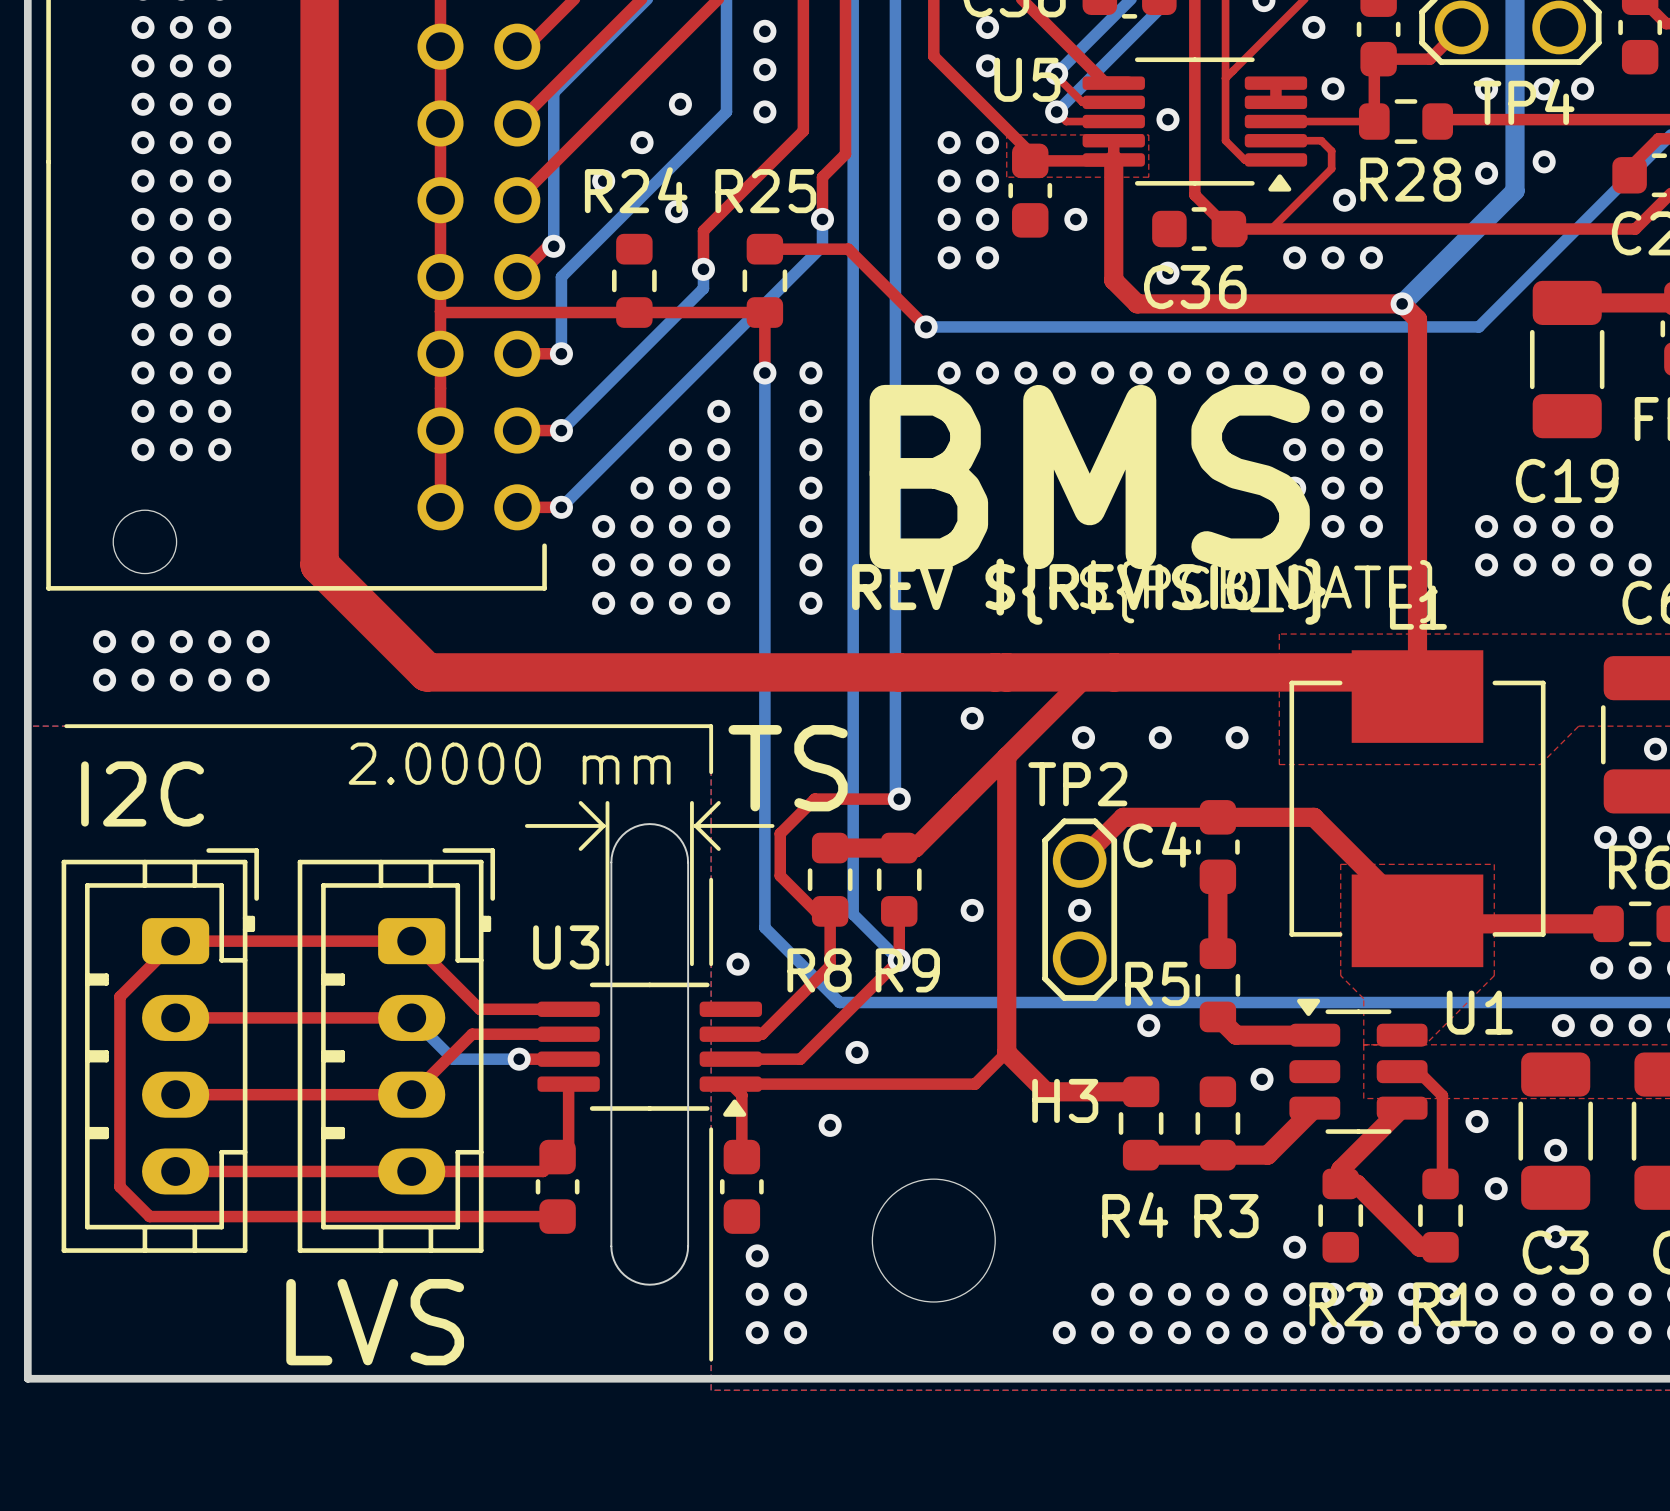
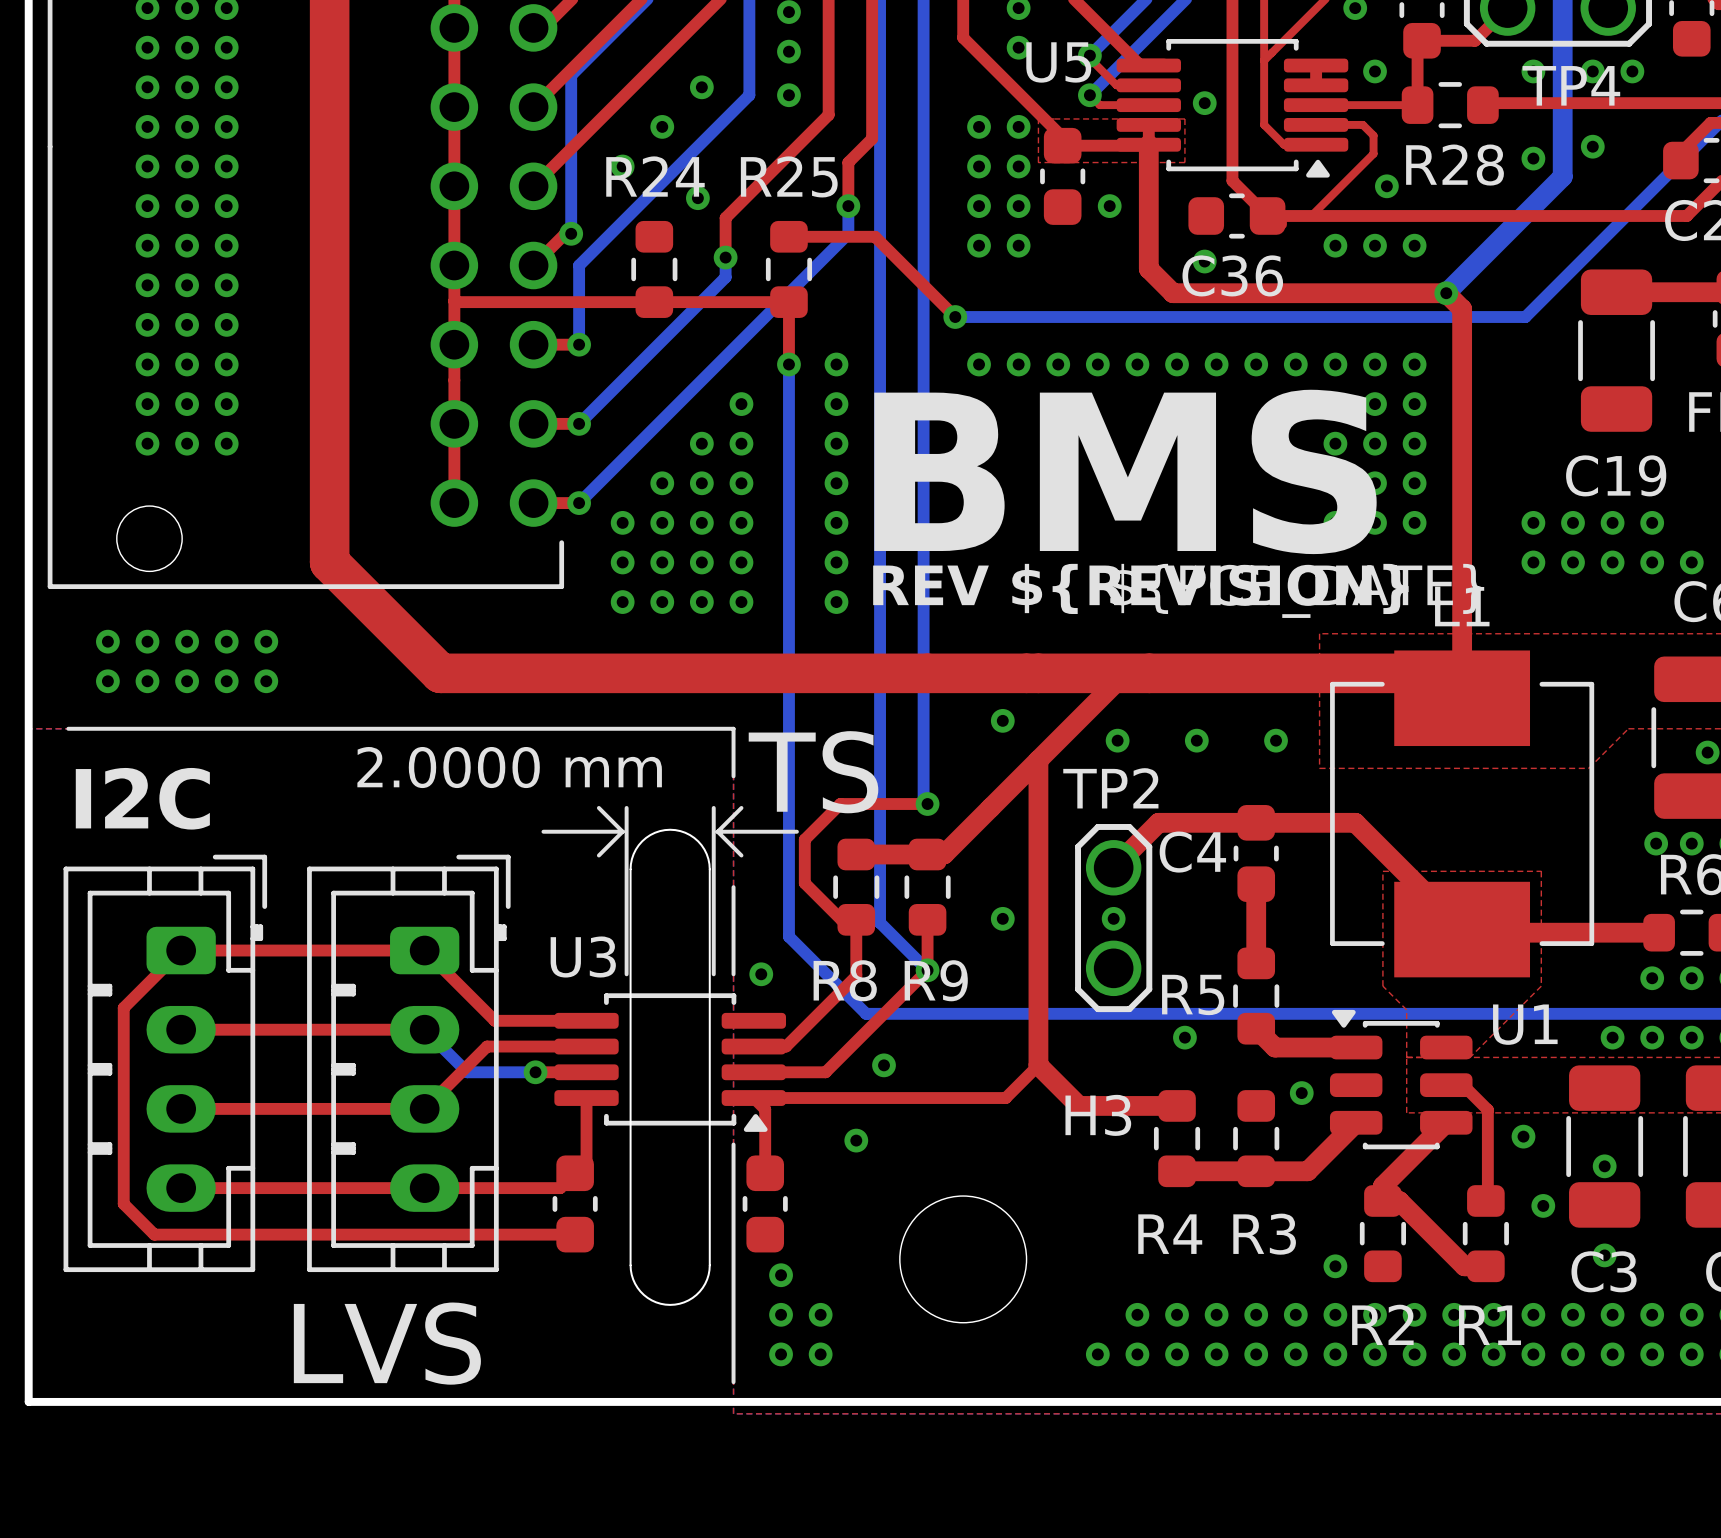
U5 footprint: [1082, 57, 1308, 192] -> [1116, 38, 1349, 178]
U3 footprint: [537, 982, 763, 1117] -> [554, 993, 787, 1132]
U1 footprint: [1289, 998, 1428, 1134] -> [1329, 1009, 1473, 1150]

